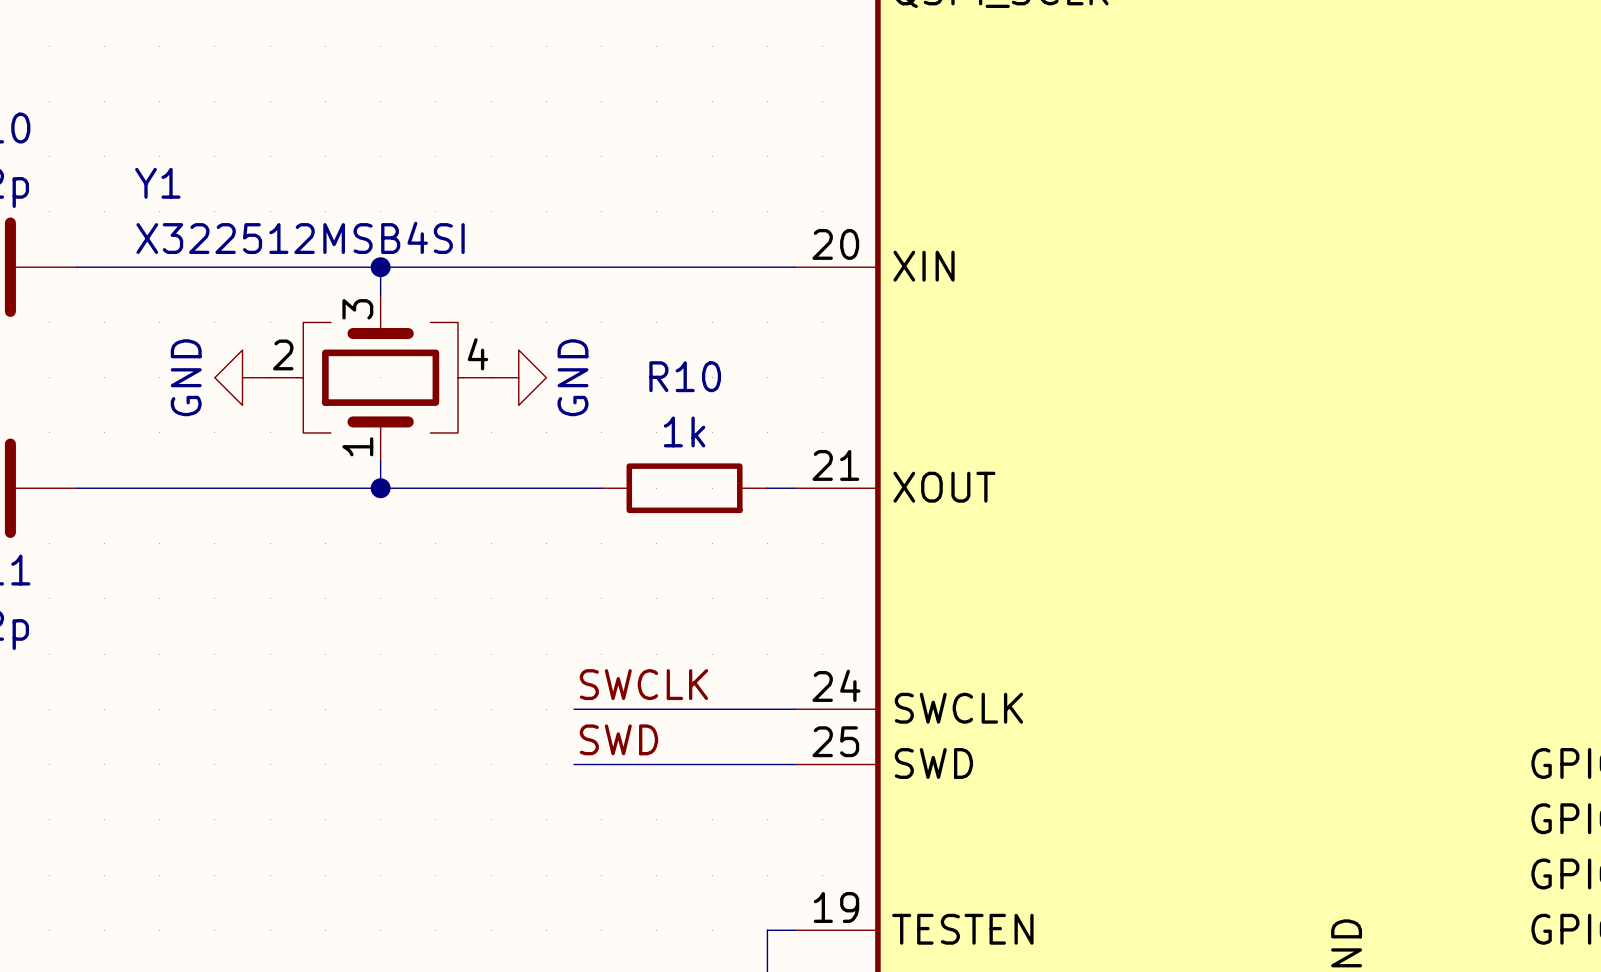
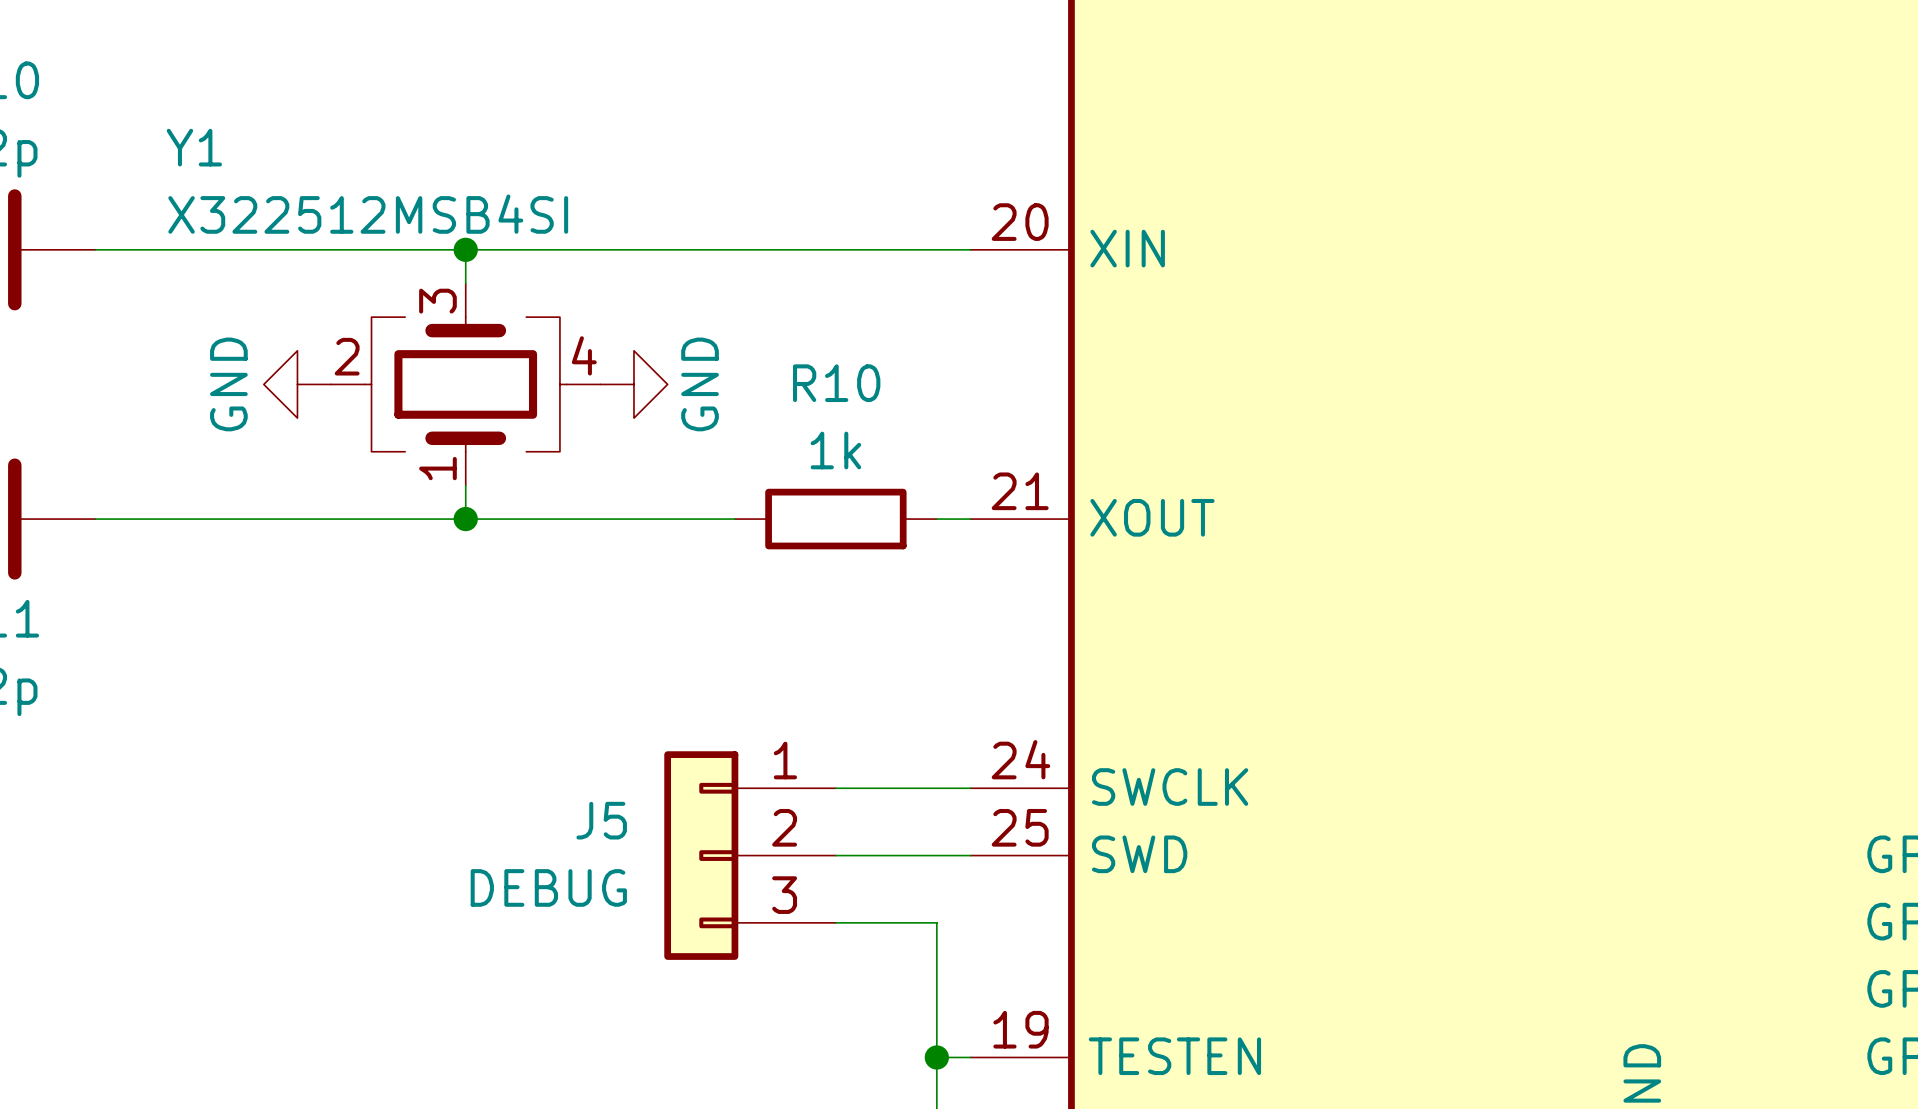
label: SWCLK (643, 684) -> none
label: SWD (618, 739) -> none
J5: none -> DEBUG (750, 855)
wire: none -> (835, 922) (936, 922) (936, 1057)
junction: none -> (936, 1057)

